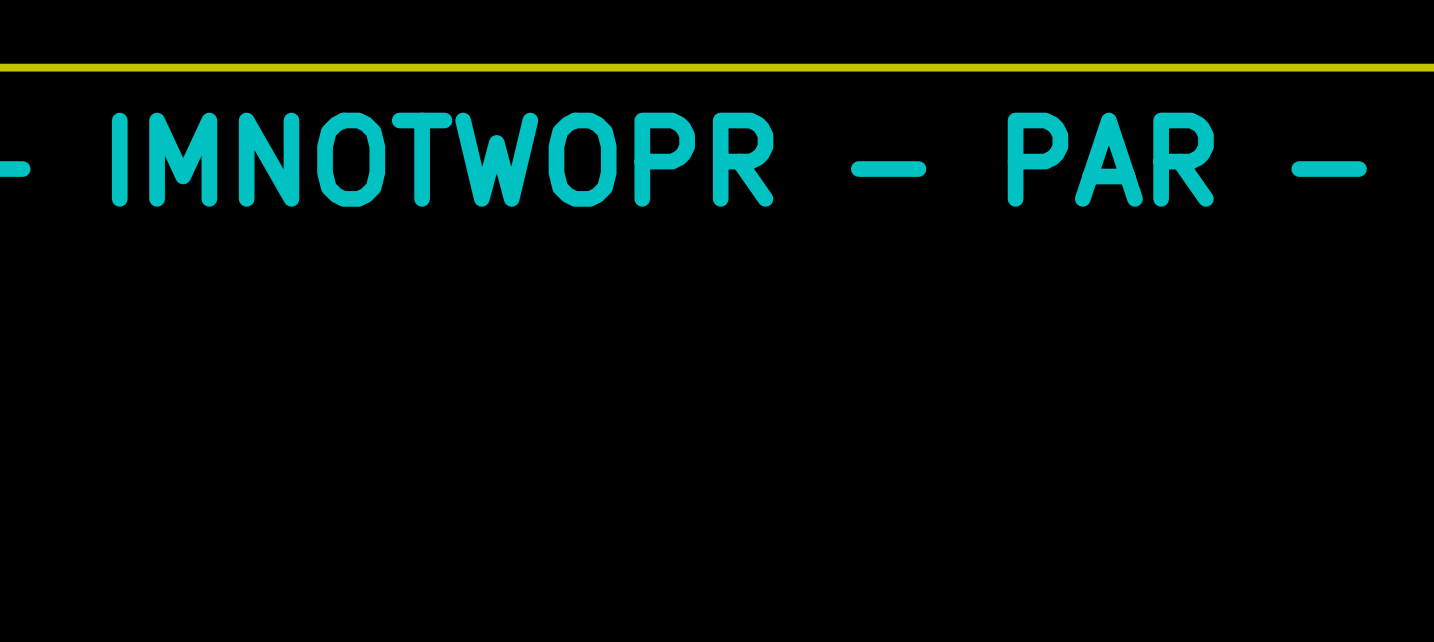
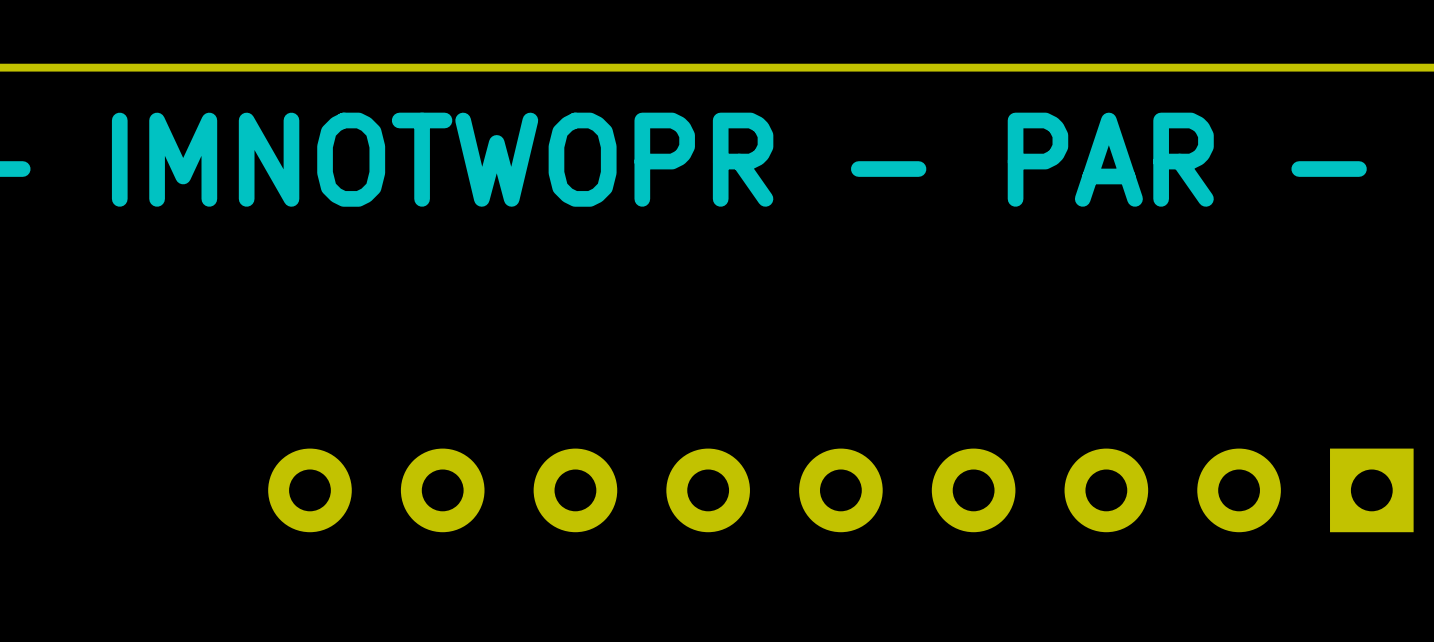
part: none -> (840, 490)

